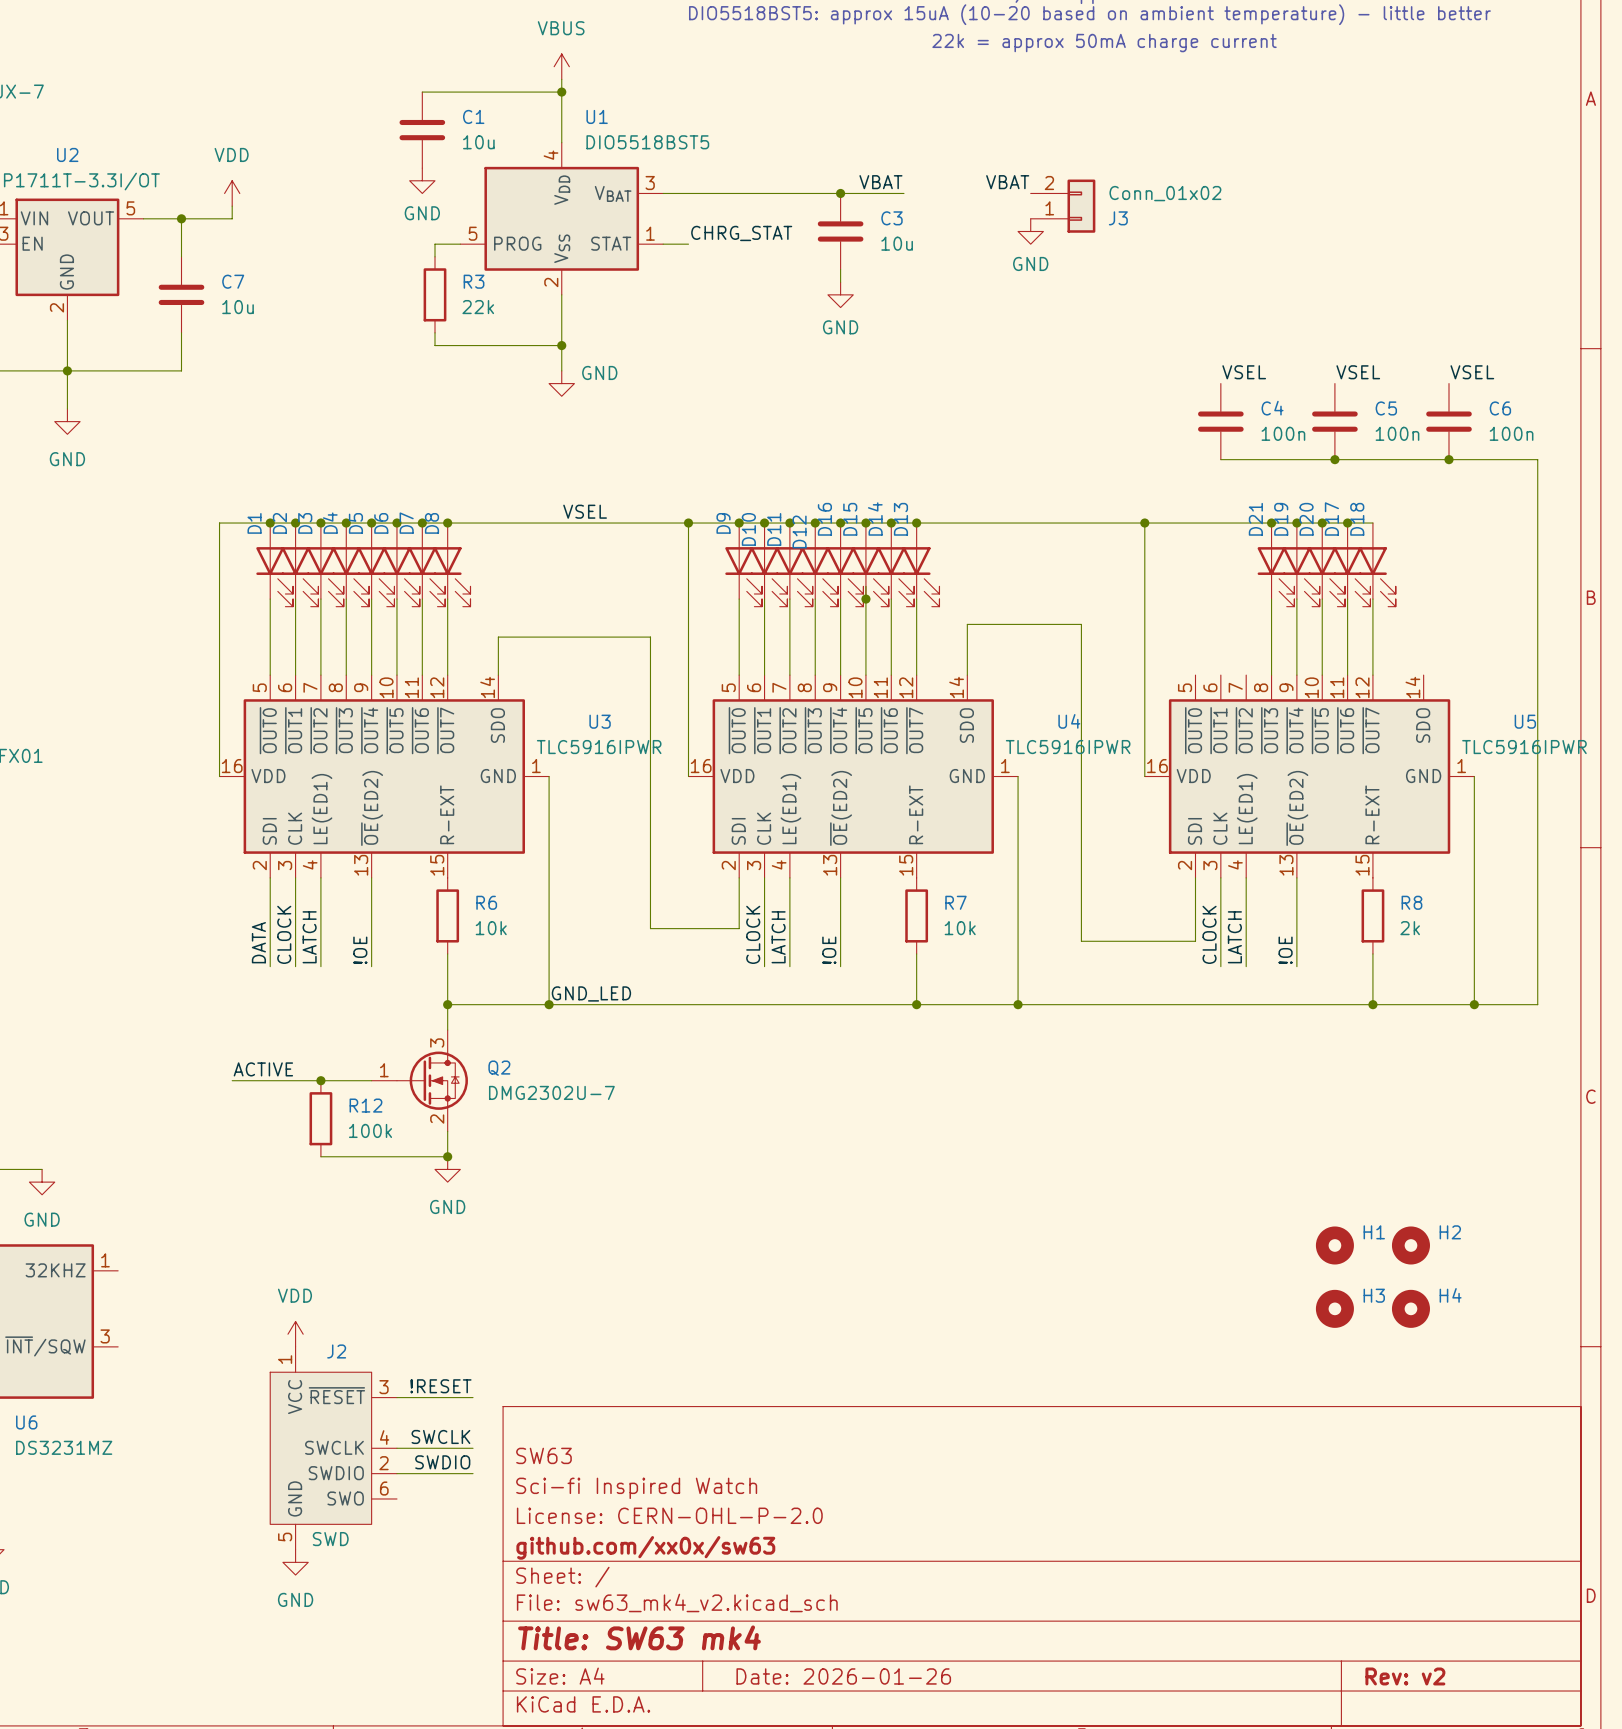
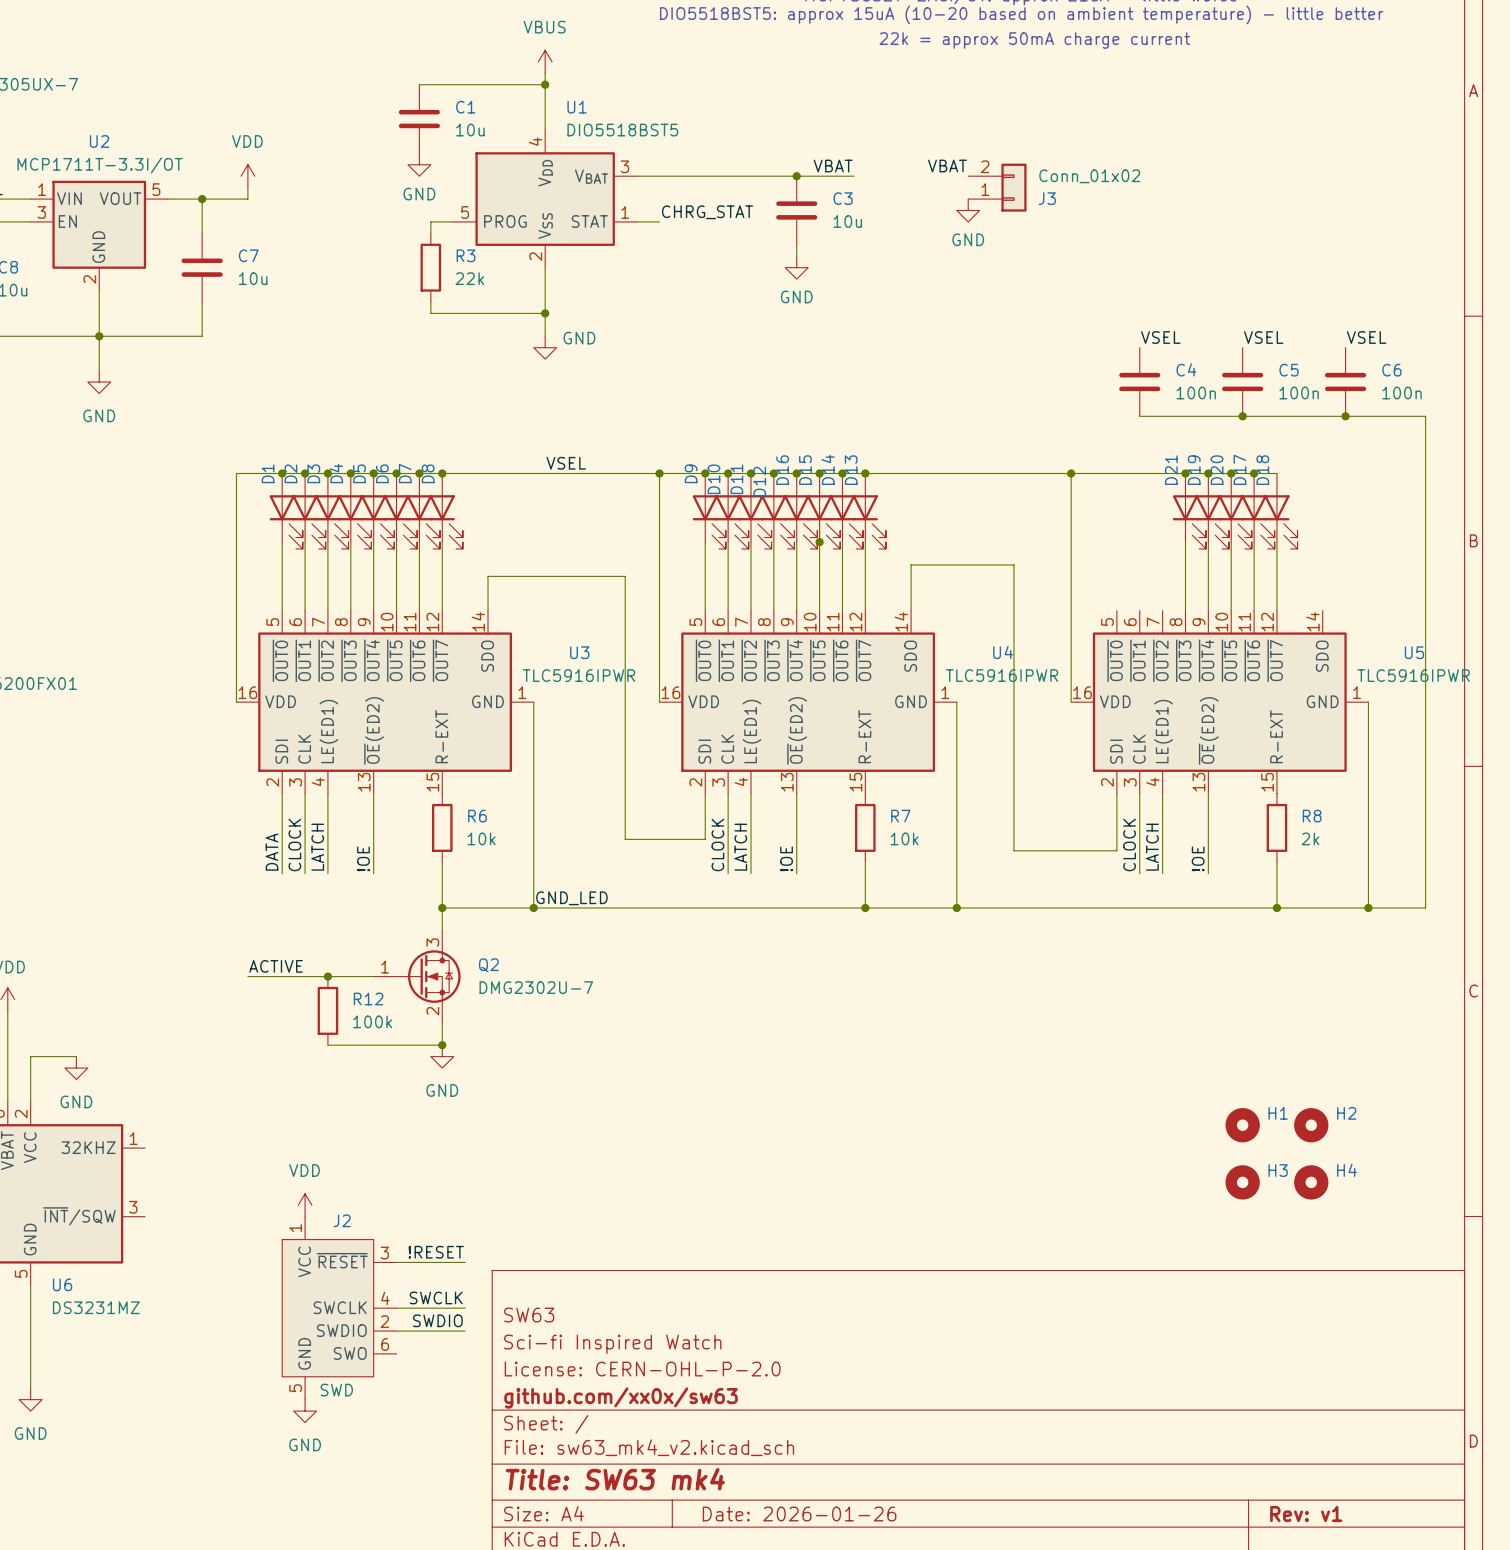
title block: Rev: v2 (1405, 1676) -> Rev: v1 (1306, 1514)

